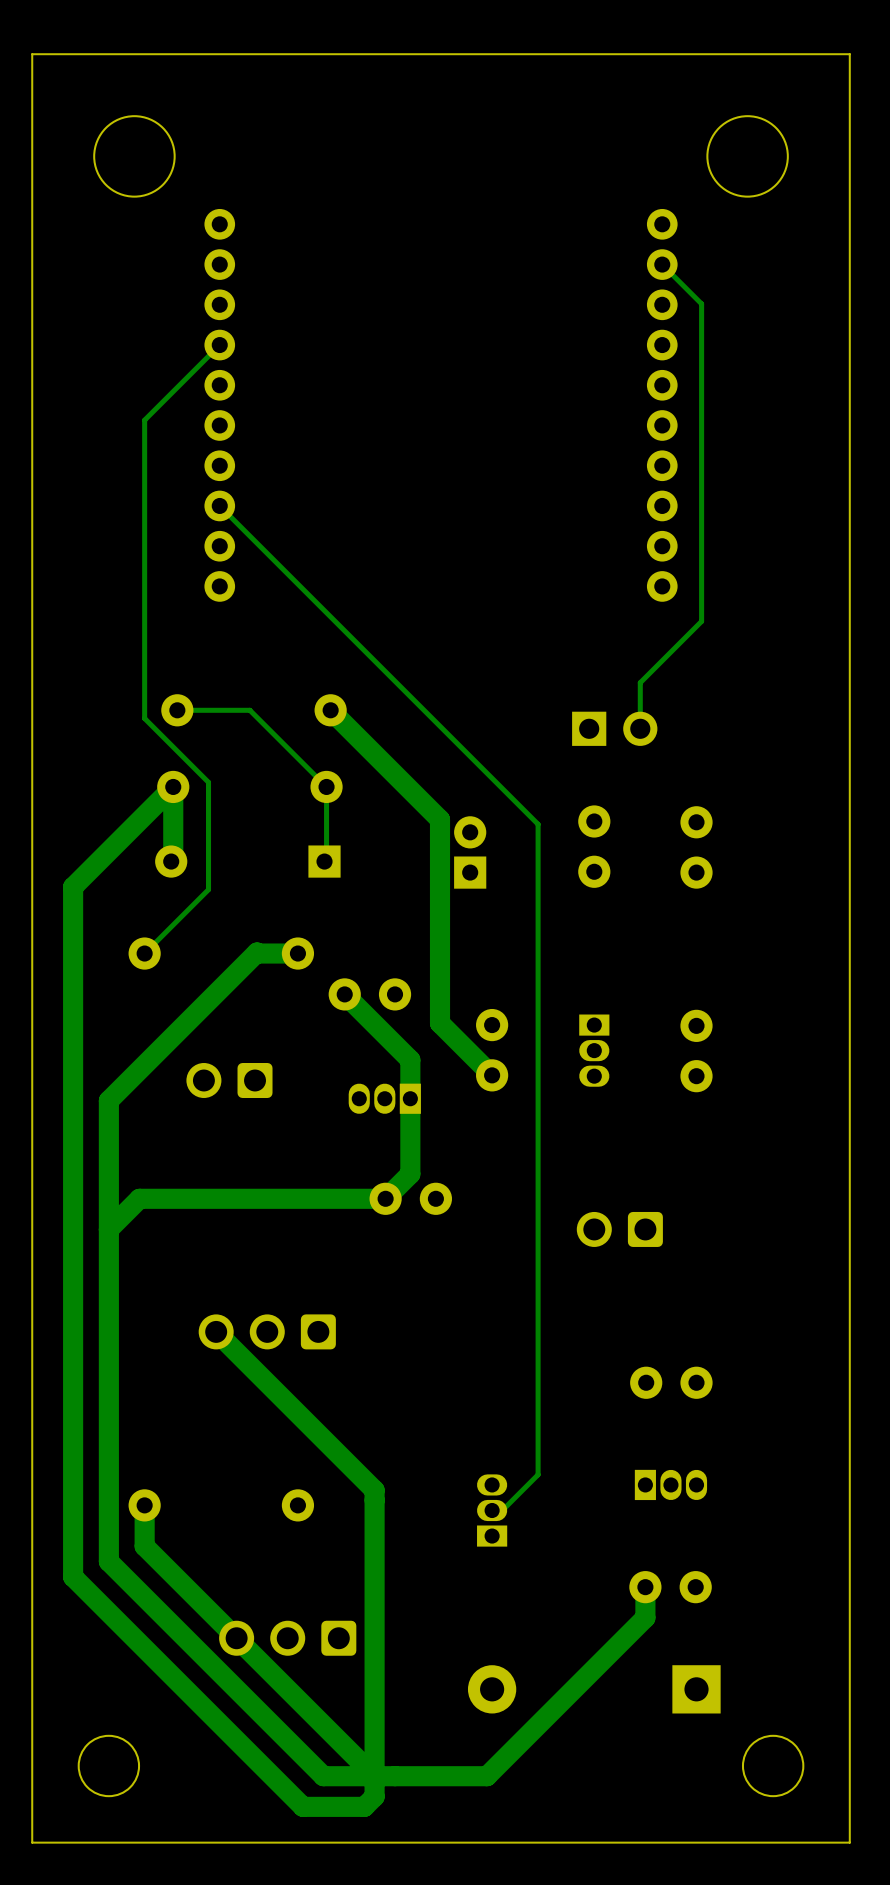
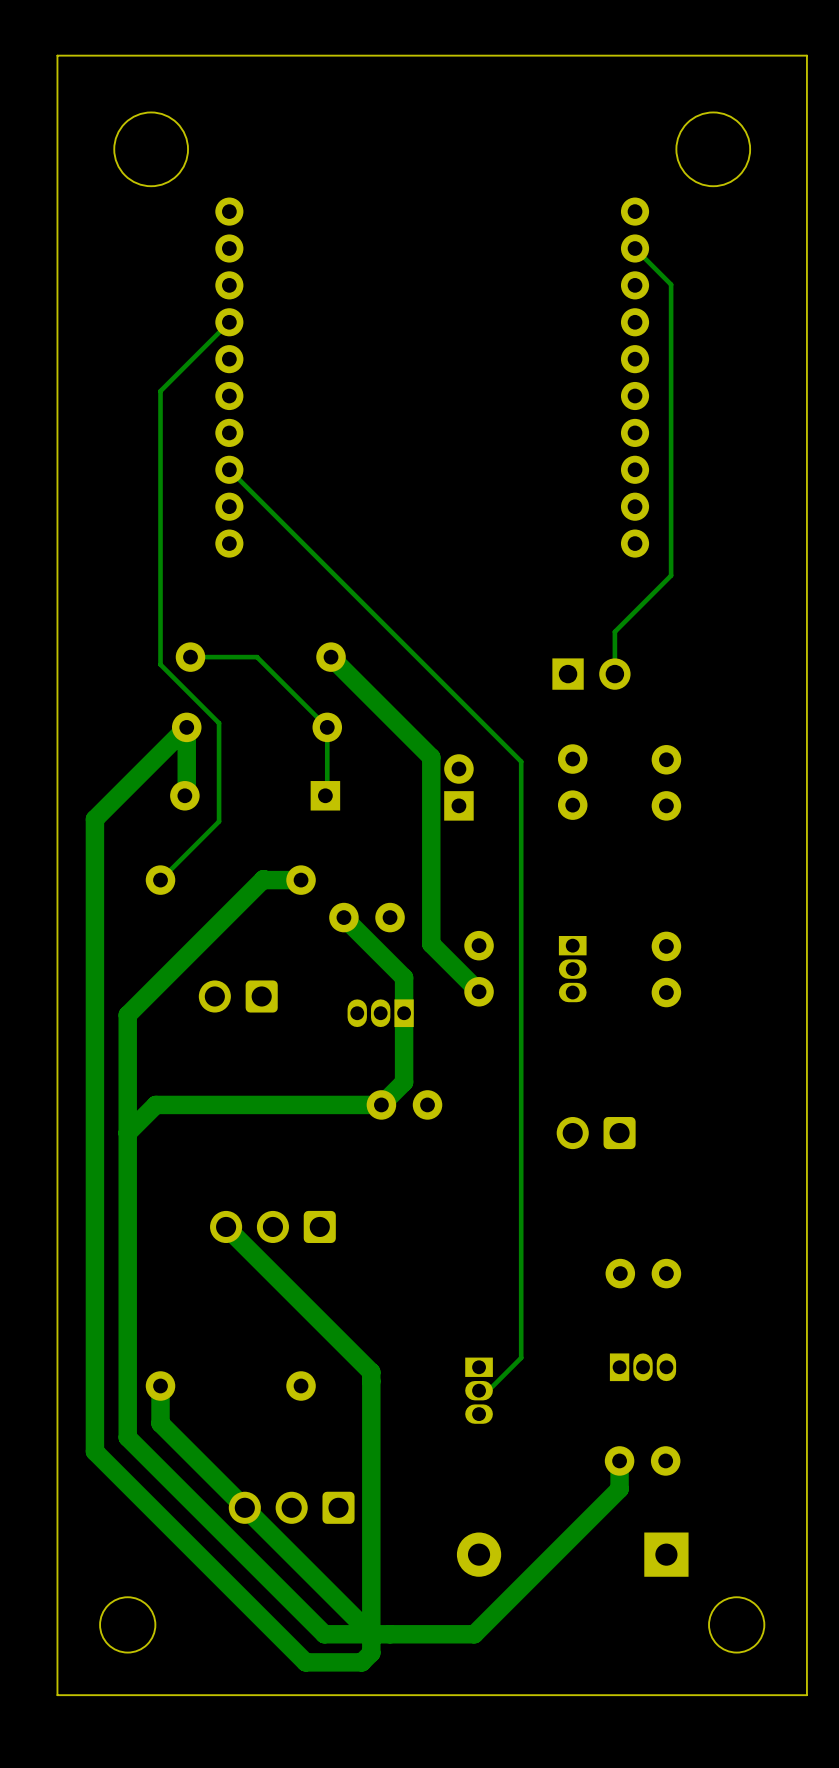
part rotation: 0° (492, 1510) -> 180° (479, 1390)

